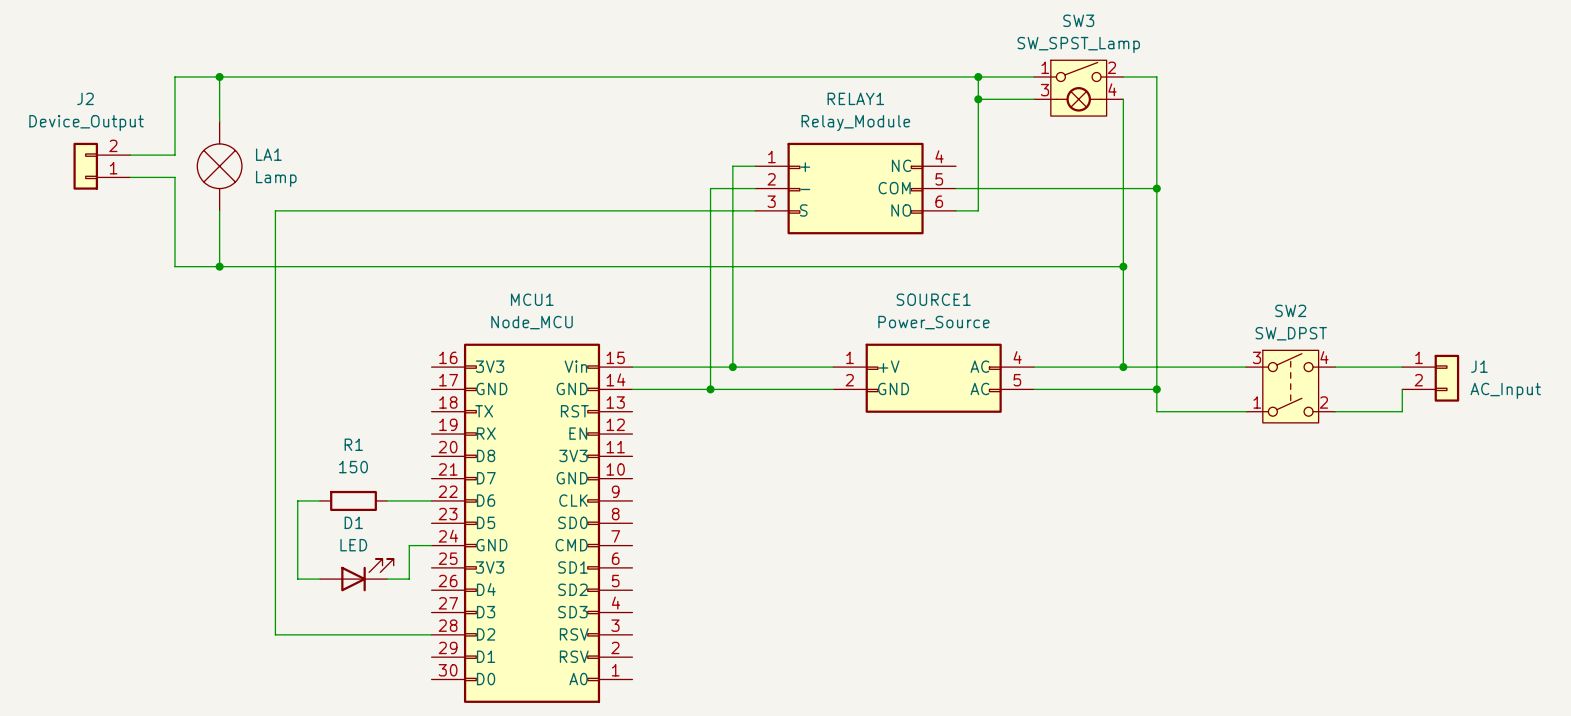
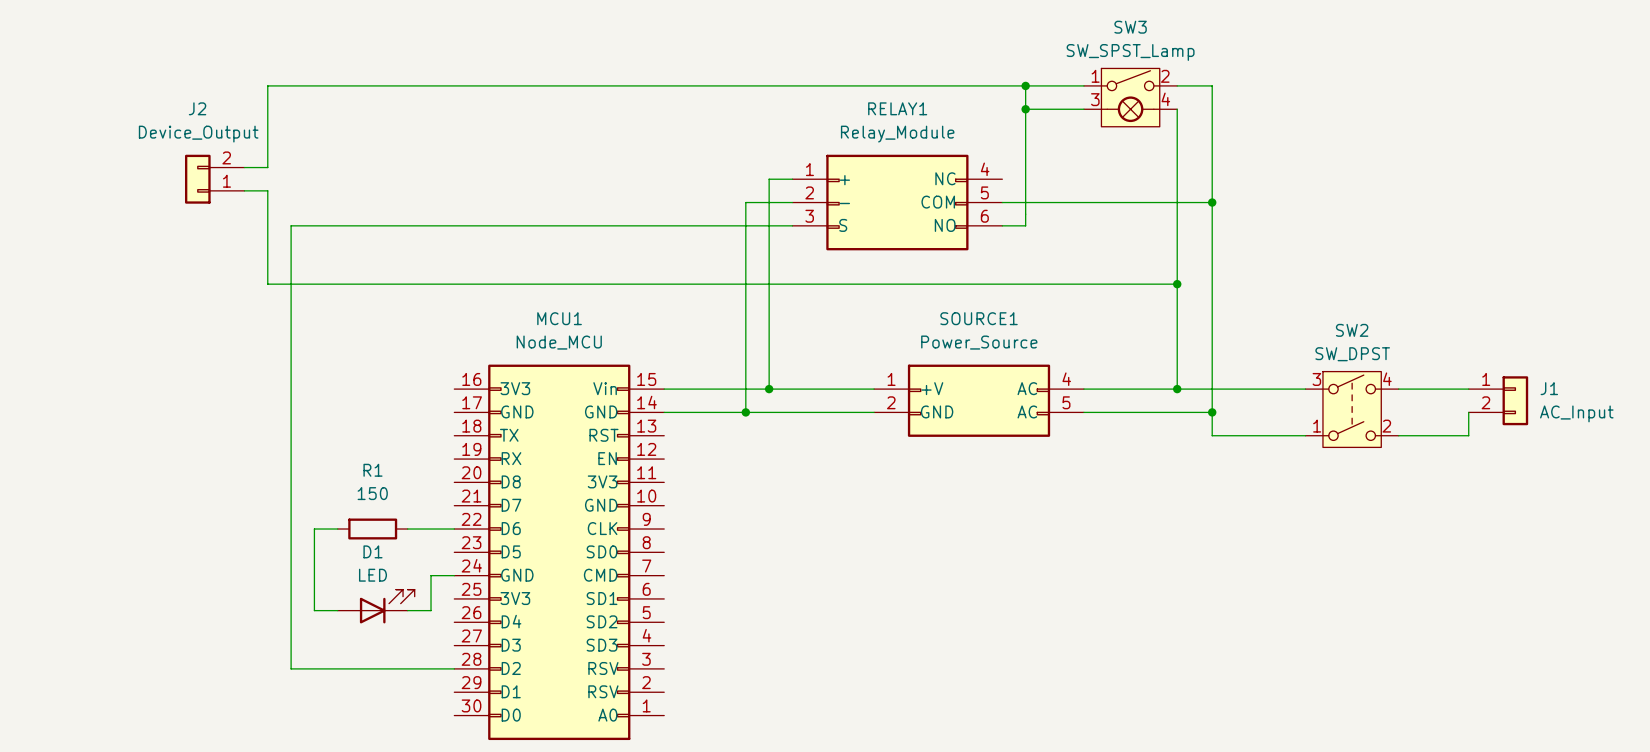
wire: (219, 76) (219, 121) -> none
junction: (219, 76) -> none
wire: (253, 76) (175, 76) (175, 155) (130, 155) -> (267, 85) (267, 167) (244, 167)
J2 position: (101, 166) -> (214, 179)
LA1: Lamp (219, 166) -> none
wire: (130, 177) (175, 177) (175, 266) (253, 266) -> (244, 190) (267, 190) (267, 284)
wire: (219, 210) (219, 266) -> none
junction: (219, 266) -> none

